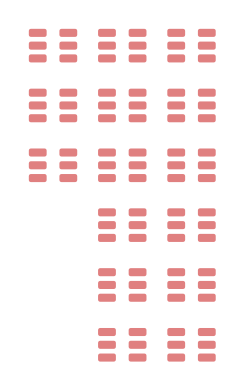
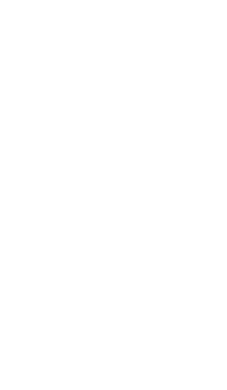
part: (53, 45) -> none
part: (122, 45) -> none
part: (191, 45) -> none
part: (53, 105) -> none
part: (122, 105) -> none
part: (191, 105) -> none
part: (53, 165) -> none
part: (122, 165) -> none
part: (191, 165) -> none
part: (122, 225) -> none
part: (191, 225) -> none
part: (122, 284) -> none
part: (191, 284) -> none
part: (122, 344) -> none
part: (191, 344) -> none

